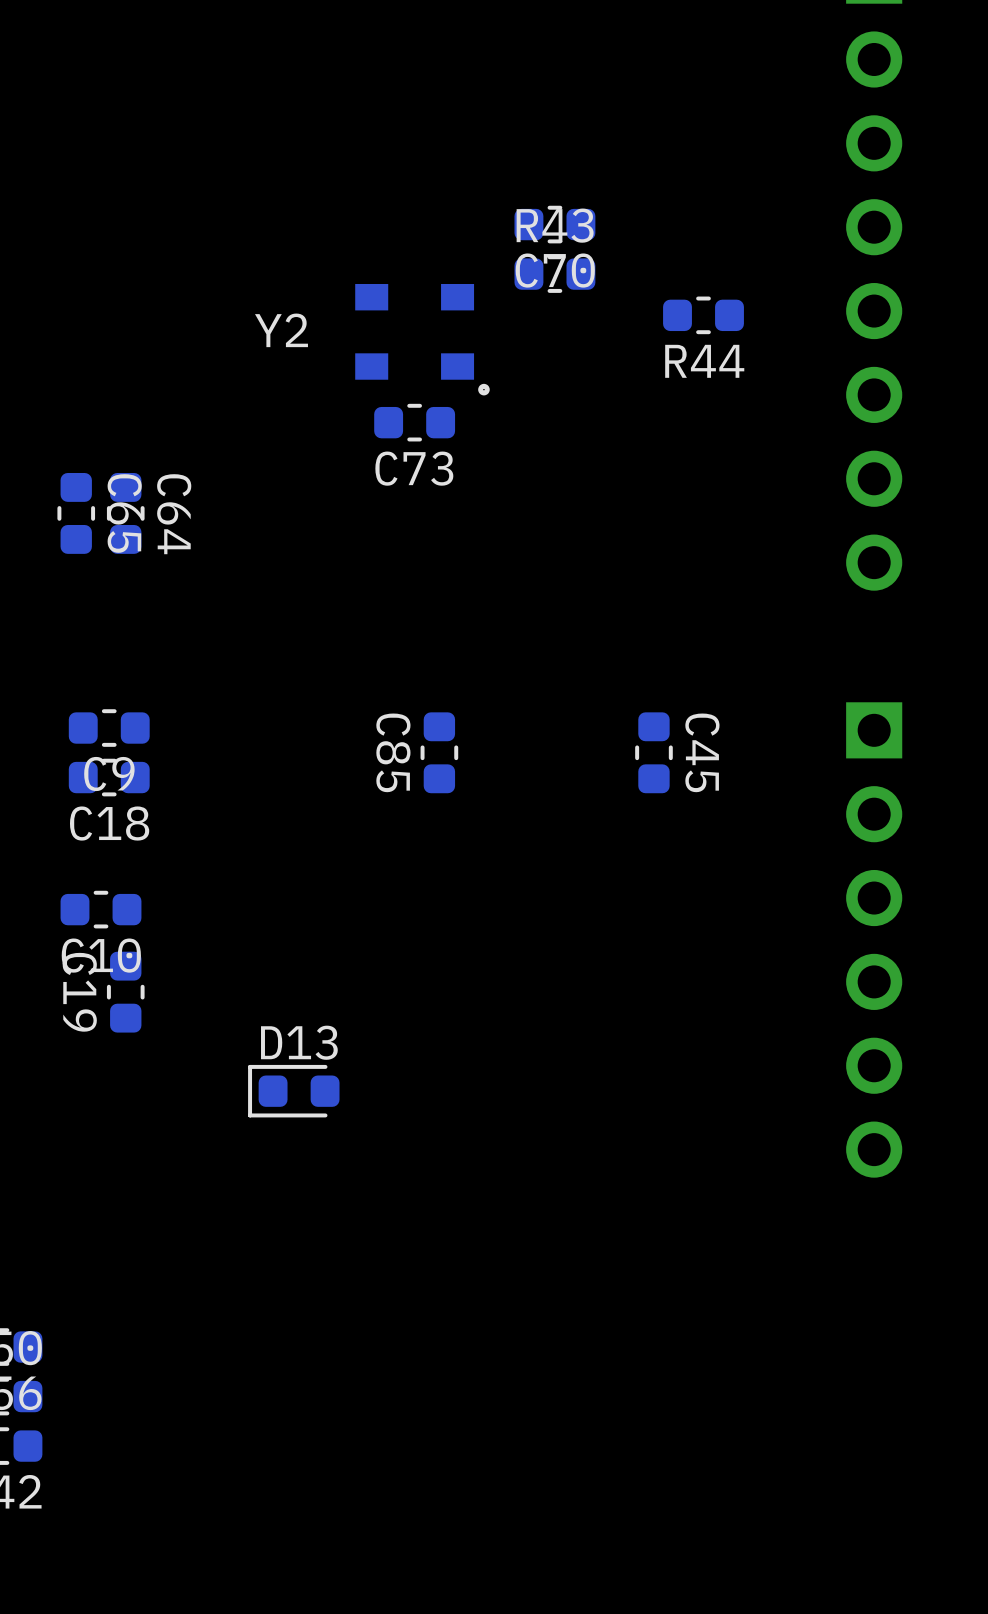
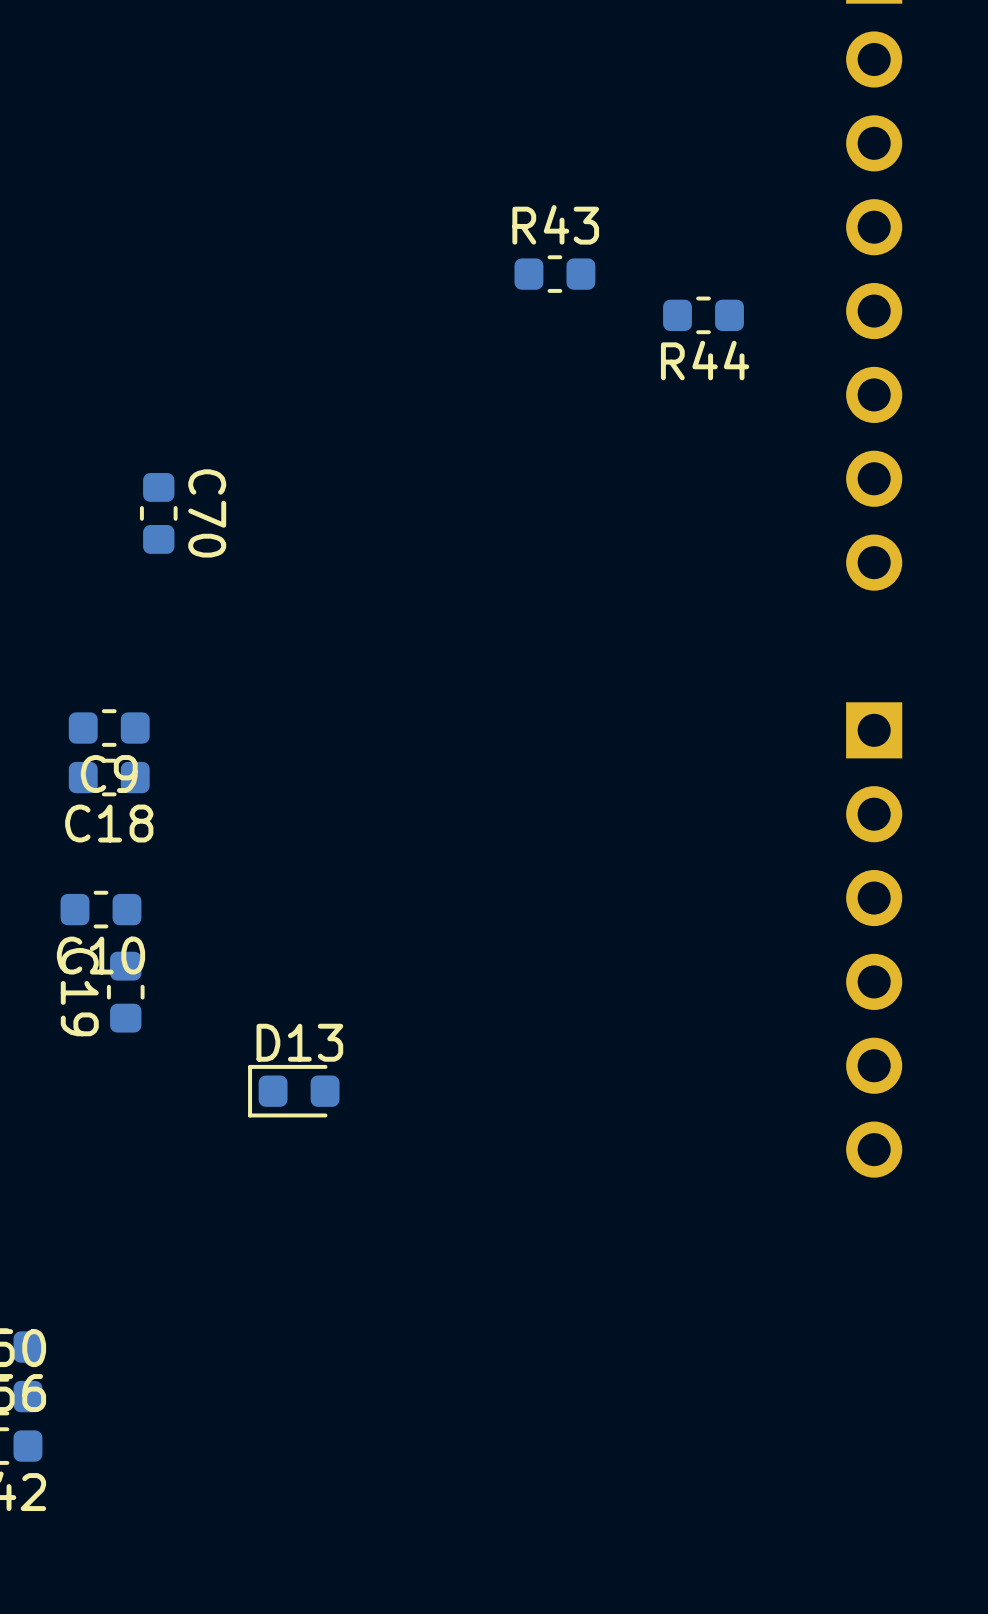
C70 rotation: 0° (554, 224) -> 90° clockwise (158, 513)
C70 position: (554, 224) -> (158, 513)
C70 name position: C70 (555, 270) -> C70 (207, 513)
Y2: (422, 339) -> none
C73: (414, 422) -> none
C65: (76, 513) -> none
C64: (125, 513) -> none
C85: (439, 752) -> none
C45: (653, 752) -> none

